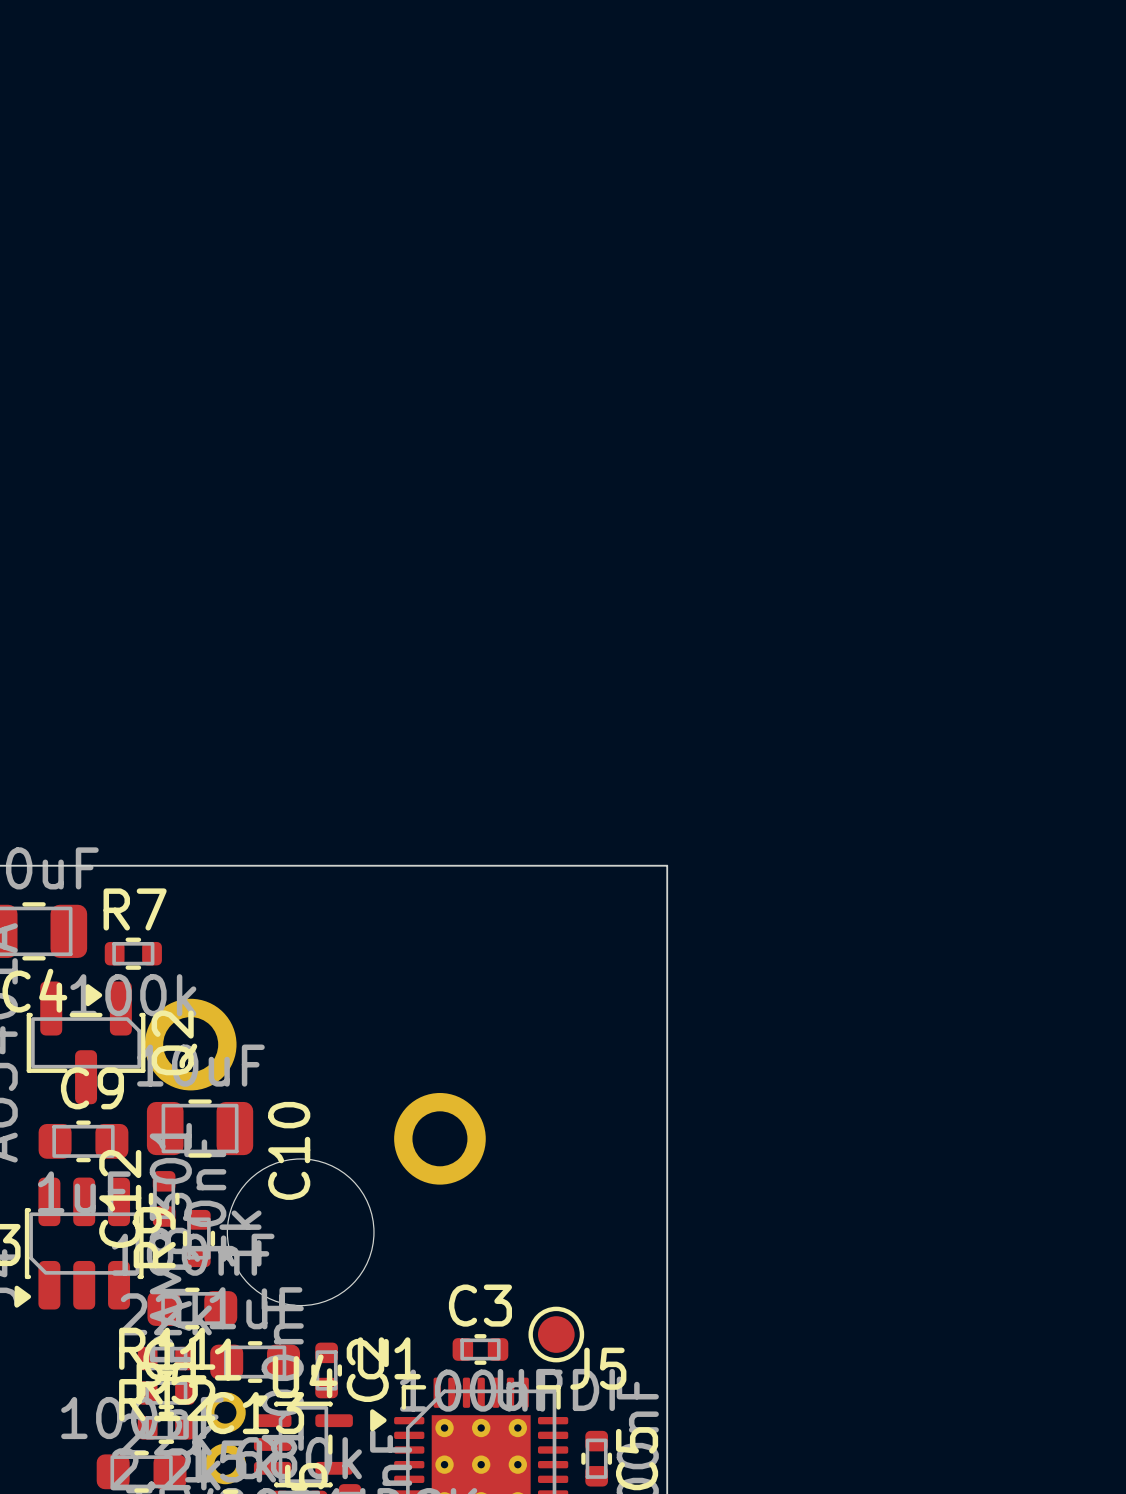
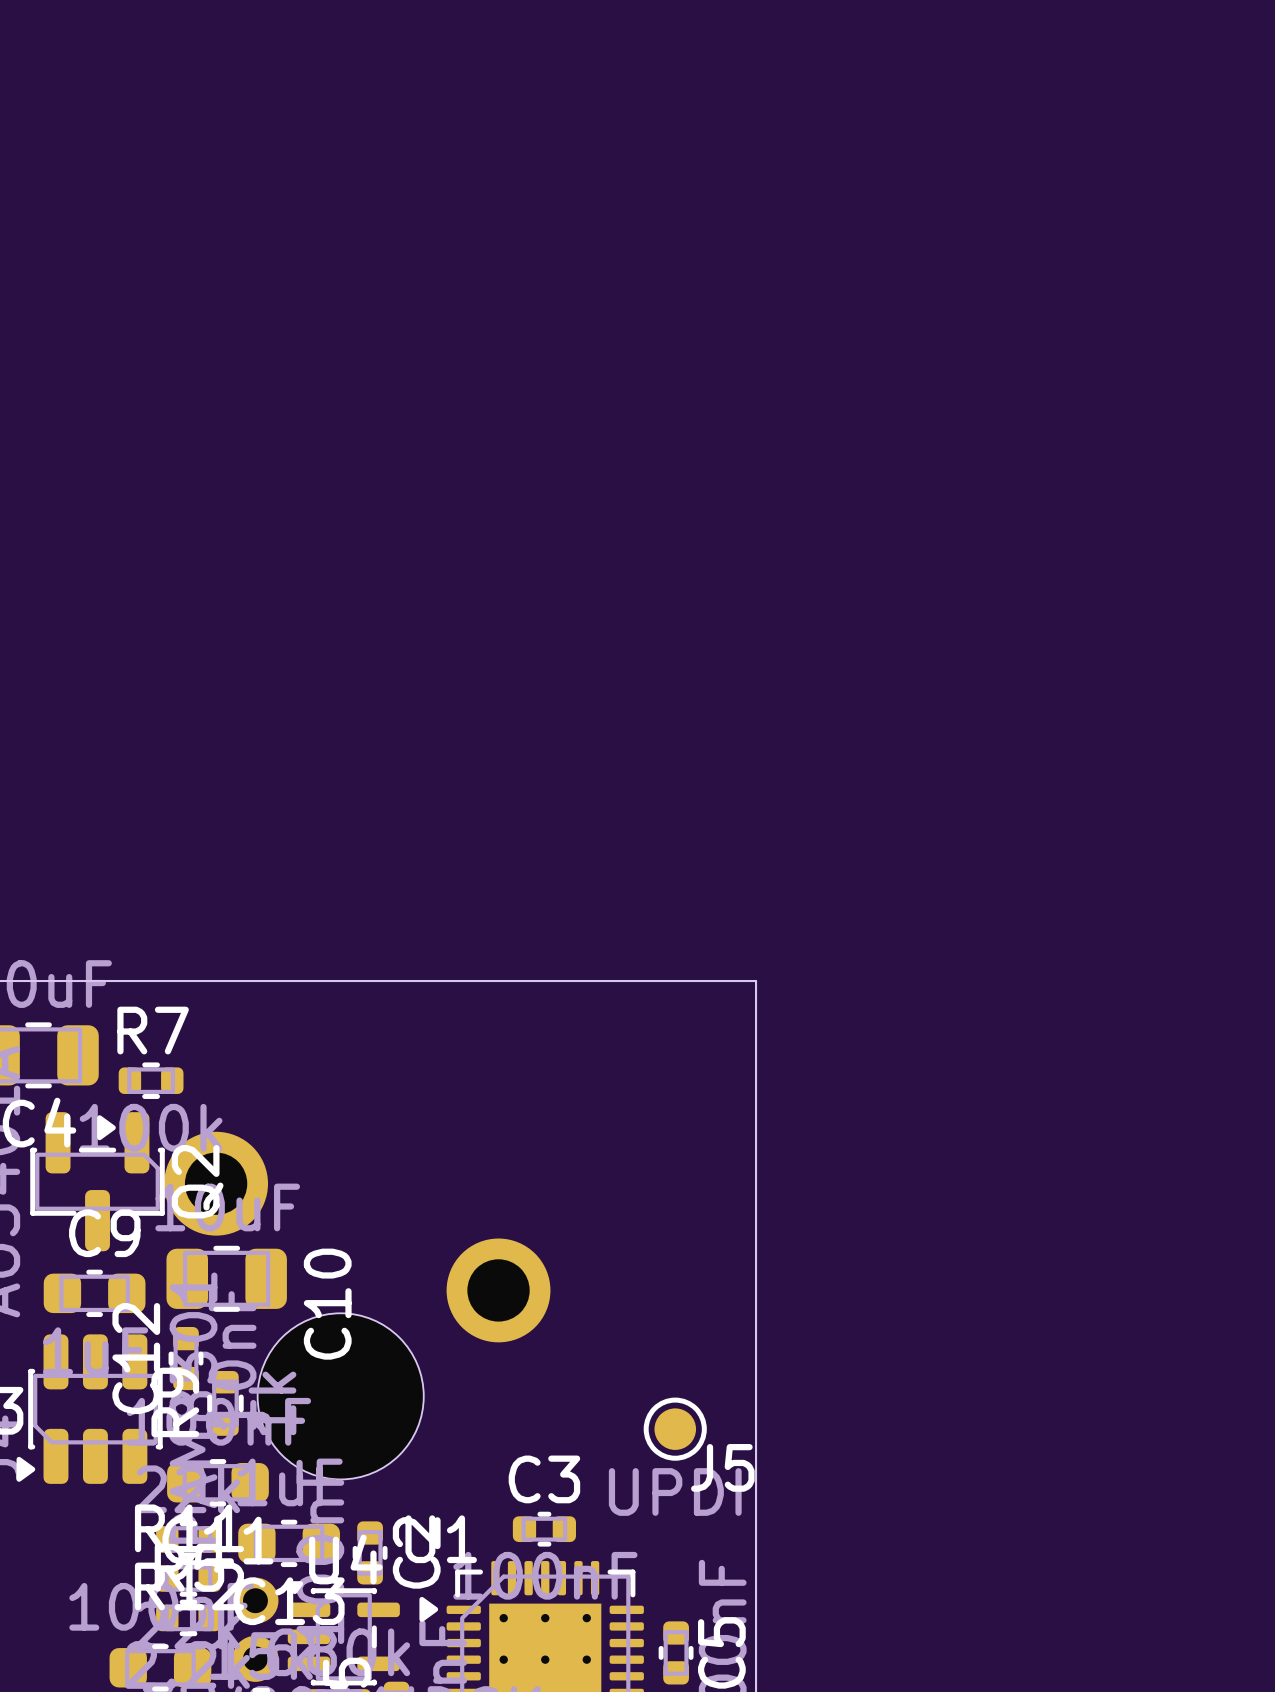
J5 position: (556, 1334) -> (675, 1429)

